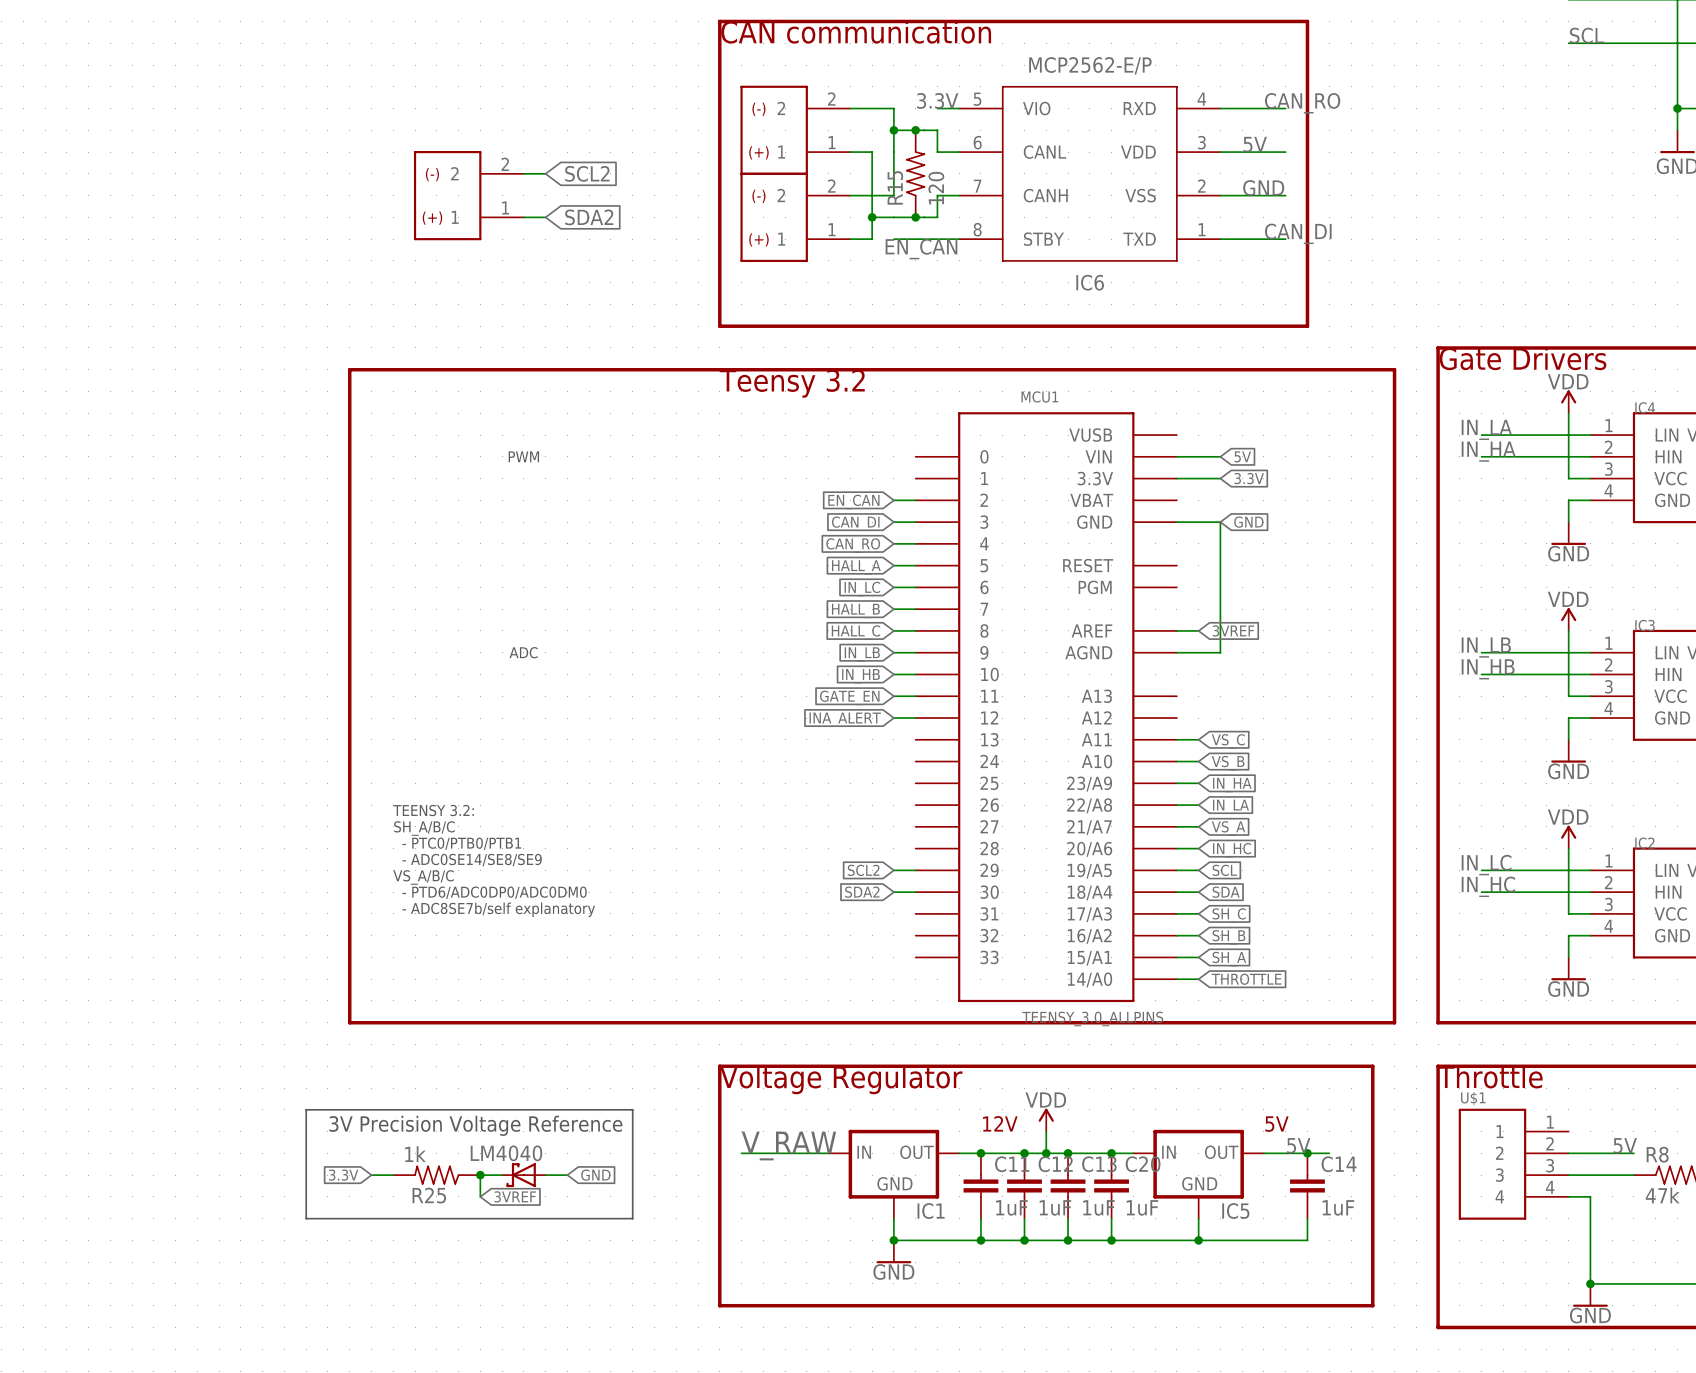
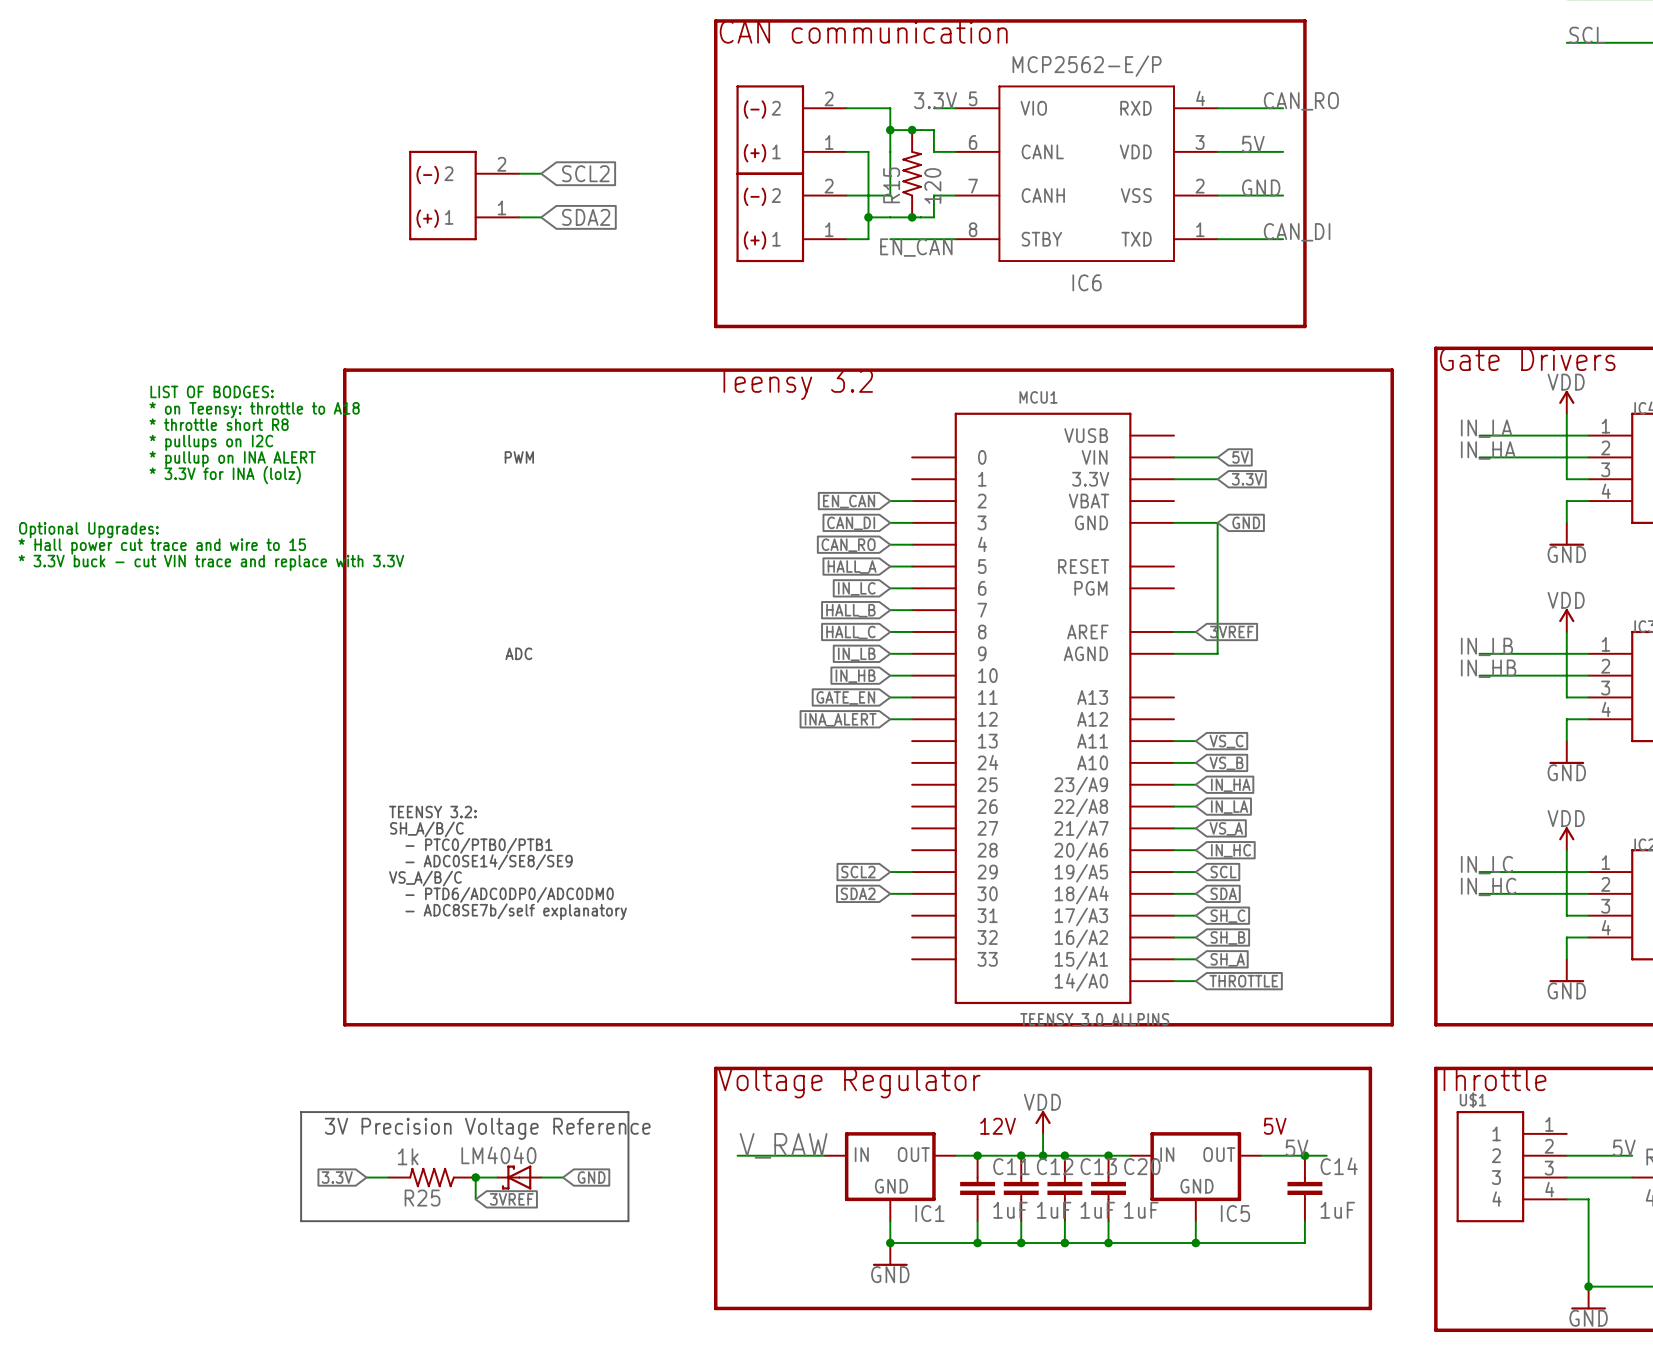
text: none -> LIST OF BODGES: (212, 391)
text: none -> * on Teensy: throttle to A18 (254, 410)
text: none -> * throttle short R8 (219, 424)
text: none -> * pullups on I2C (211, 442)
text: none -> * pullup on INA ALERT (232, 459)
text: none -> * 3.3V for INA (lolz) (225, 475)
text: none -> Optional Upgrades: (88, 530)
text: none -> * Hall power cut trace and wire to 15 (162, 546)
text: none -> * 3.3V buck - cut VIN trace and replace with 3.3V (211, 562)

